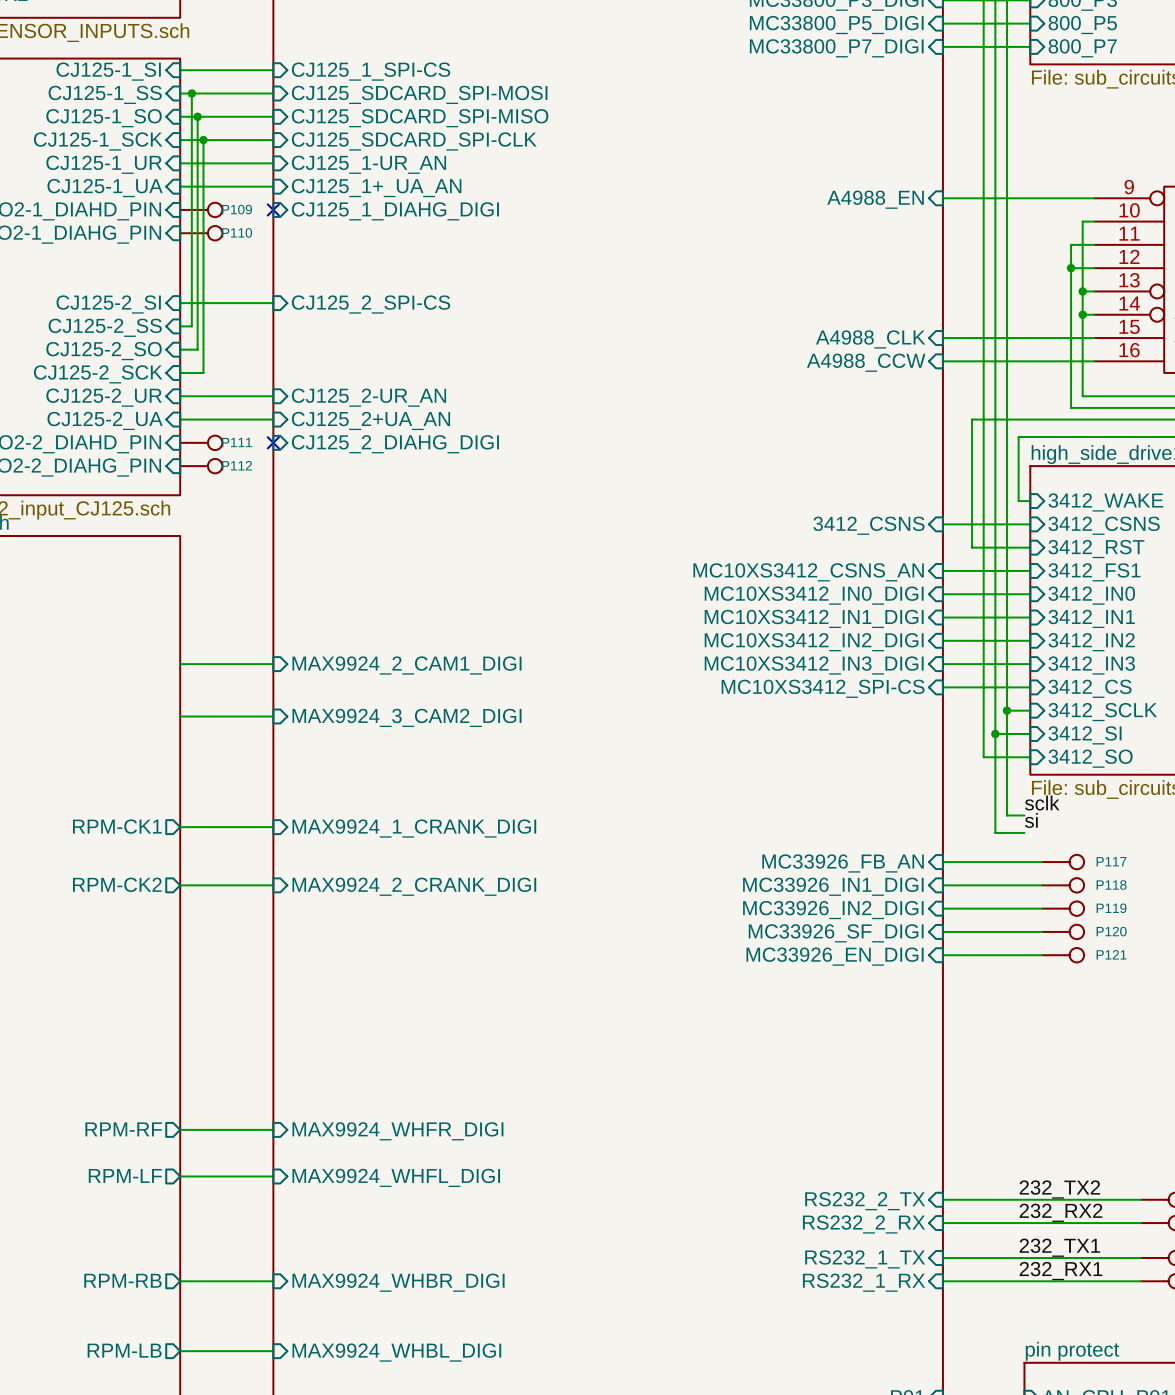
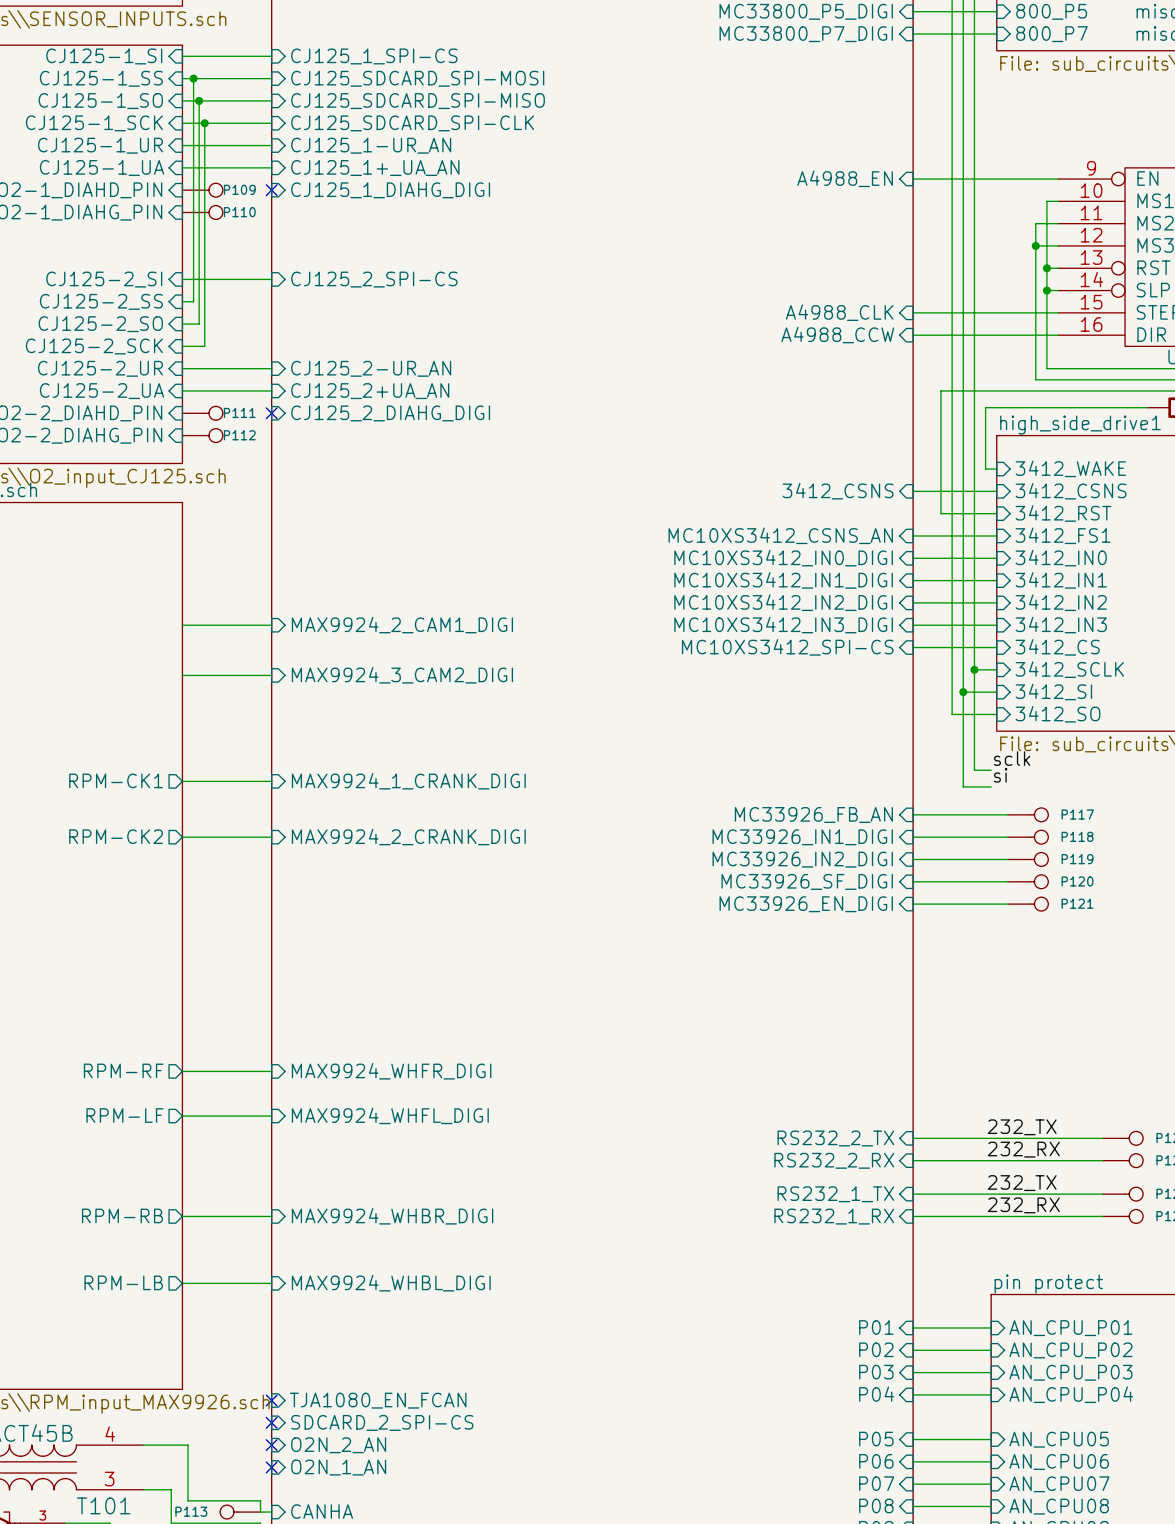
label: 232_TX2 (1059, 1189) -> 232_TX (1022, 1127)
label: 232_RX2 (1060, 1212) -> 232_RX (1023, 1149)
label: 232_TX1 (1059, 1247) -> 232_TX (1022, 1183)
label: 232_RX1 (1061, 1271) -> 232_RX (1023, 1205)

